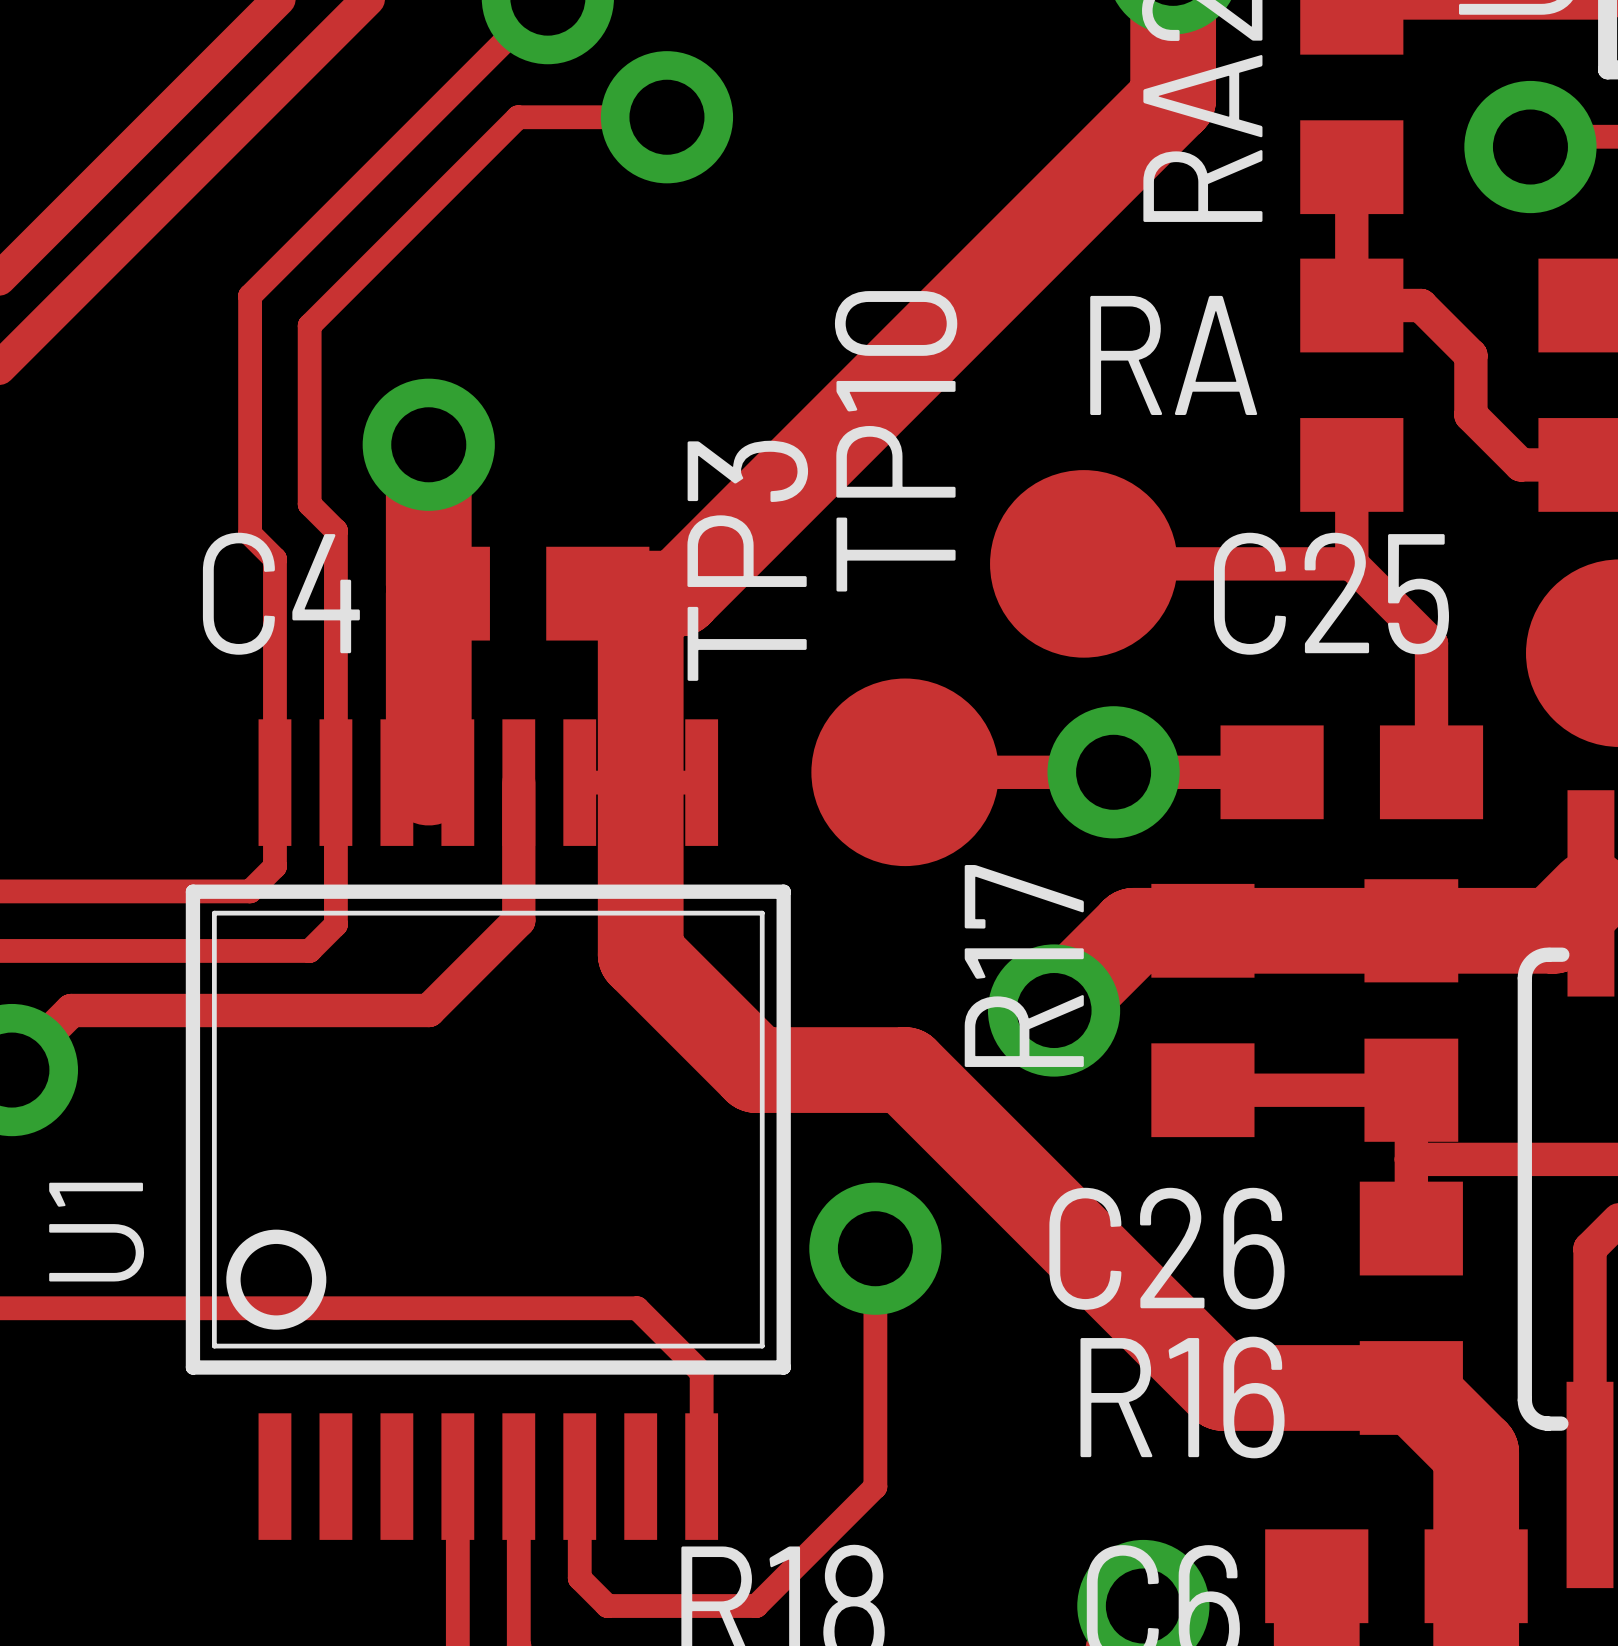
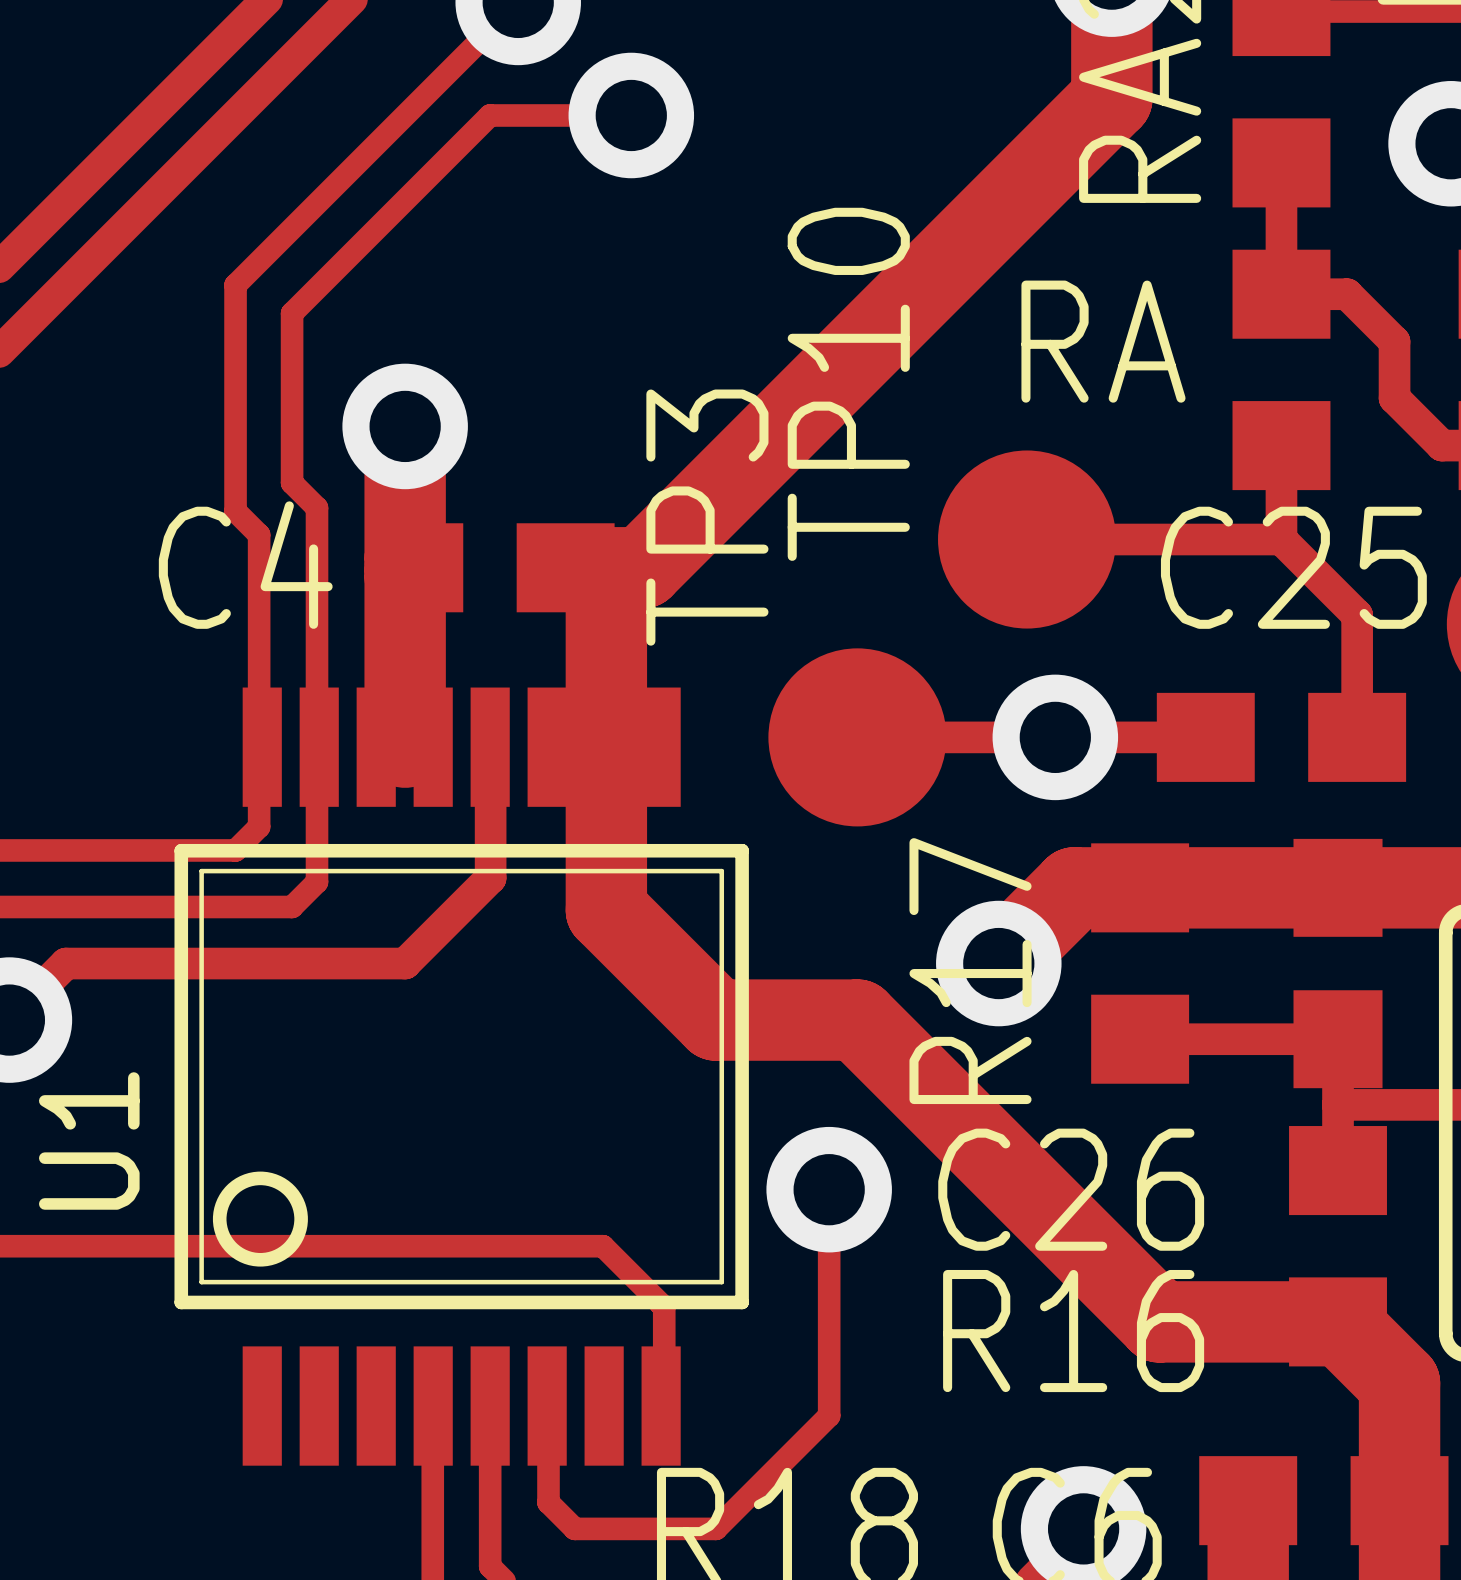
U1 footprint: [185, 719, 791, 1540] -> [174, 687, 749, 1466]

